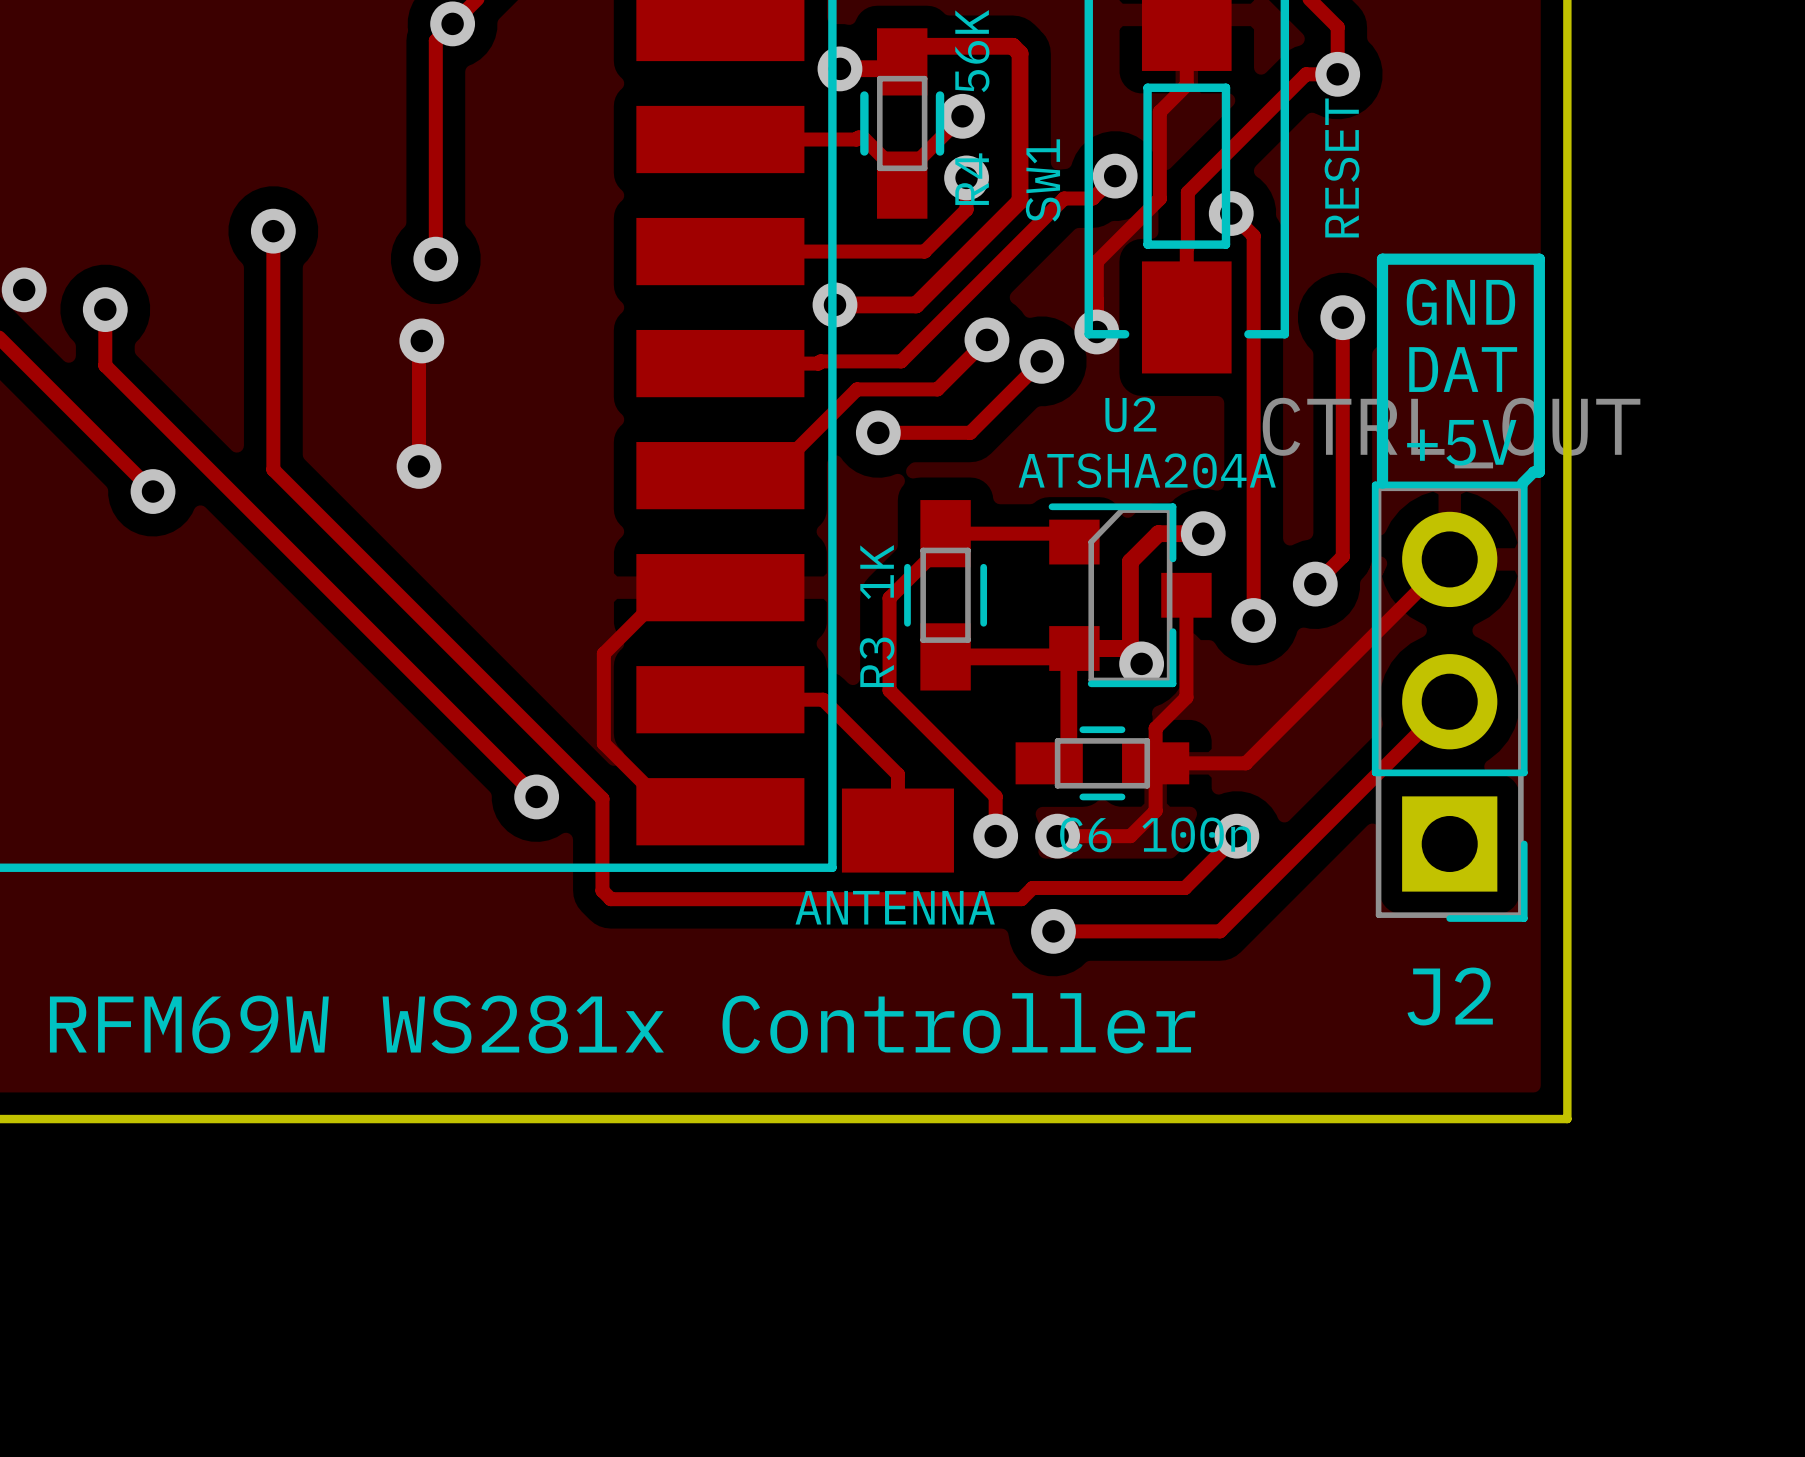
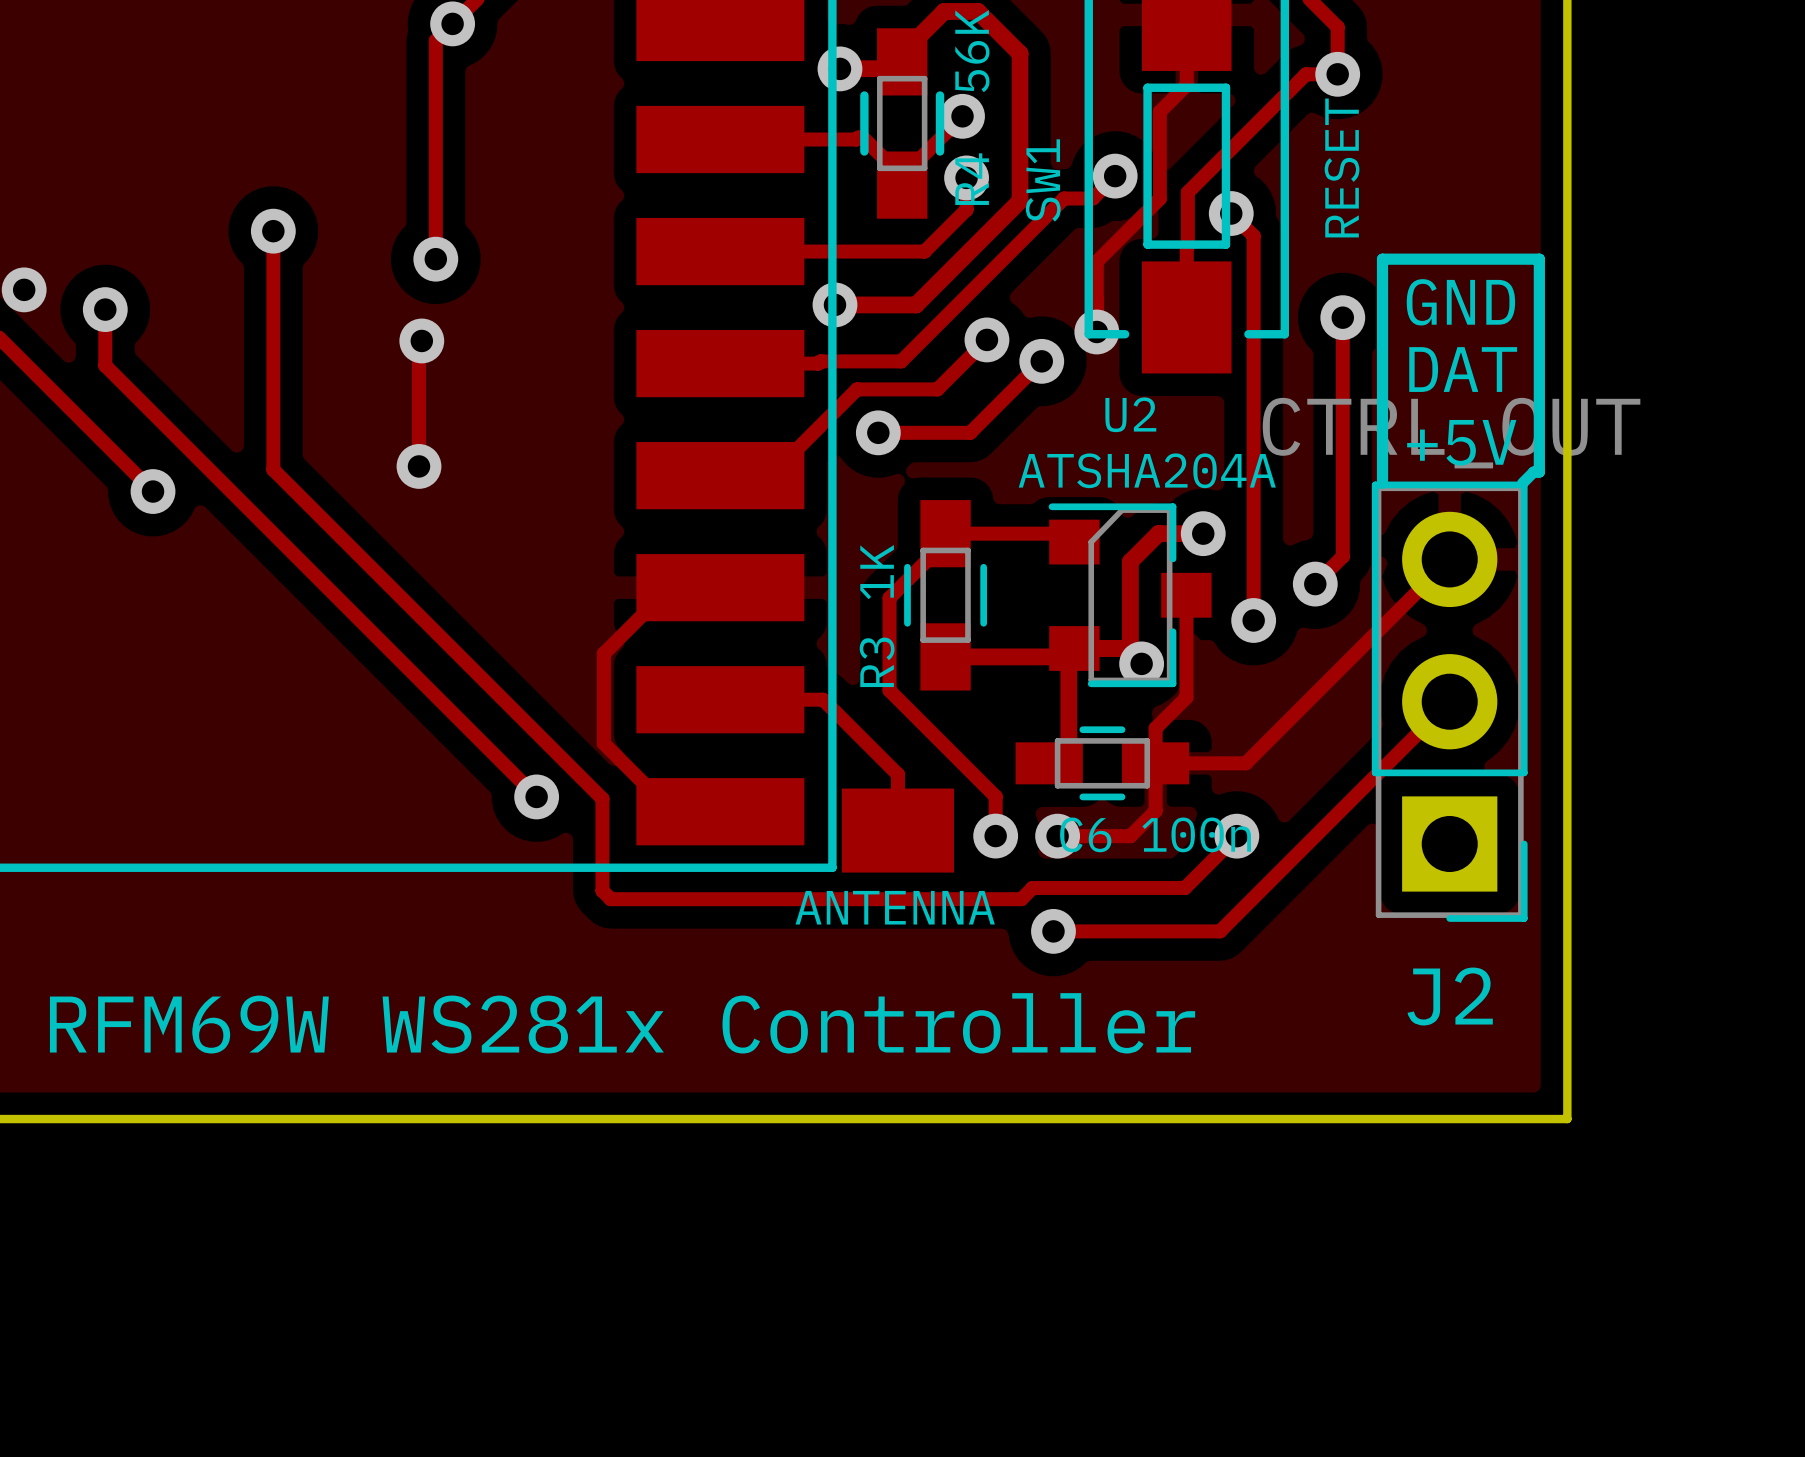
track: (909, 46) (1012, 46) -> (909, 46) (944, 11) (977, 11) (1012, 46)

